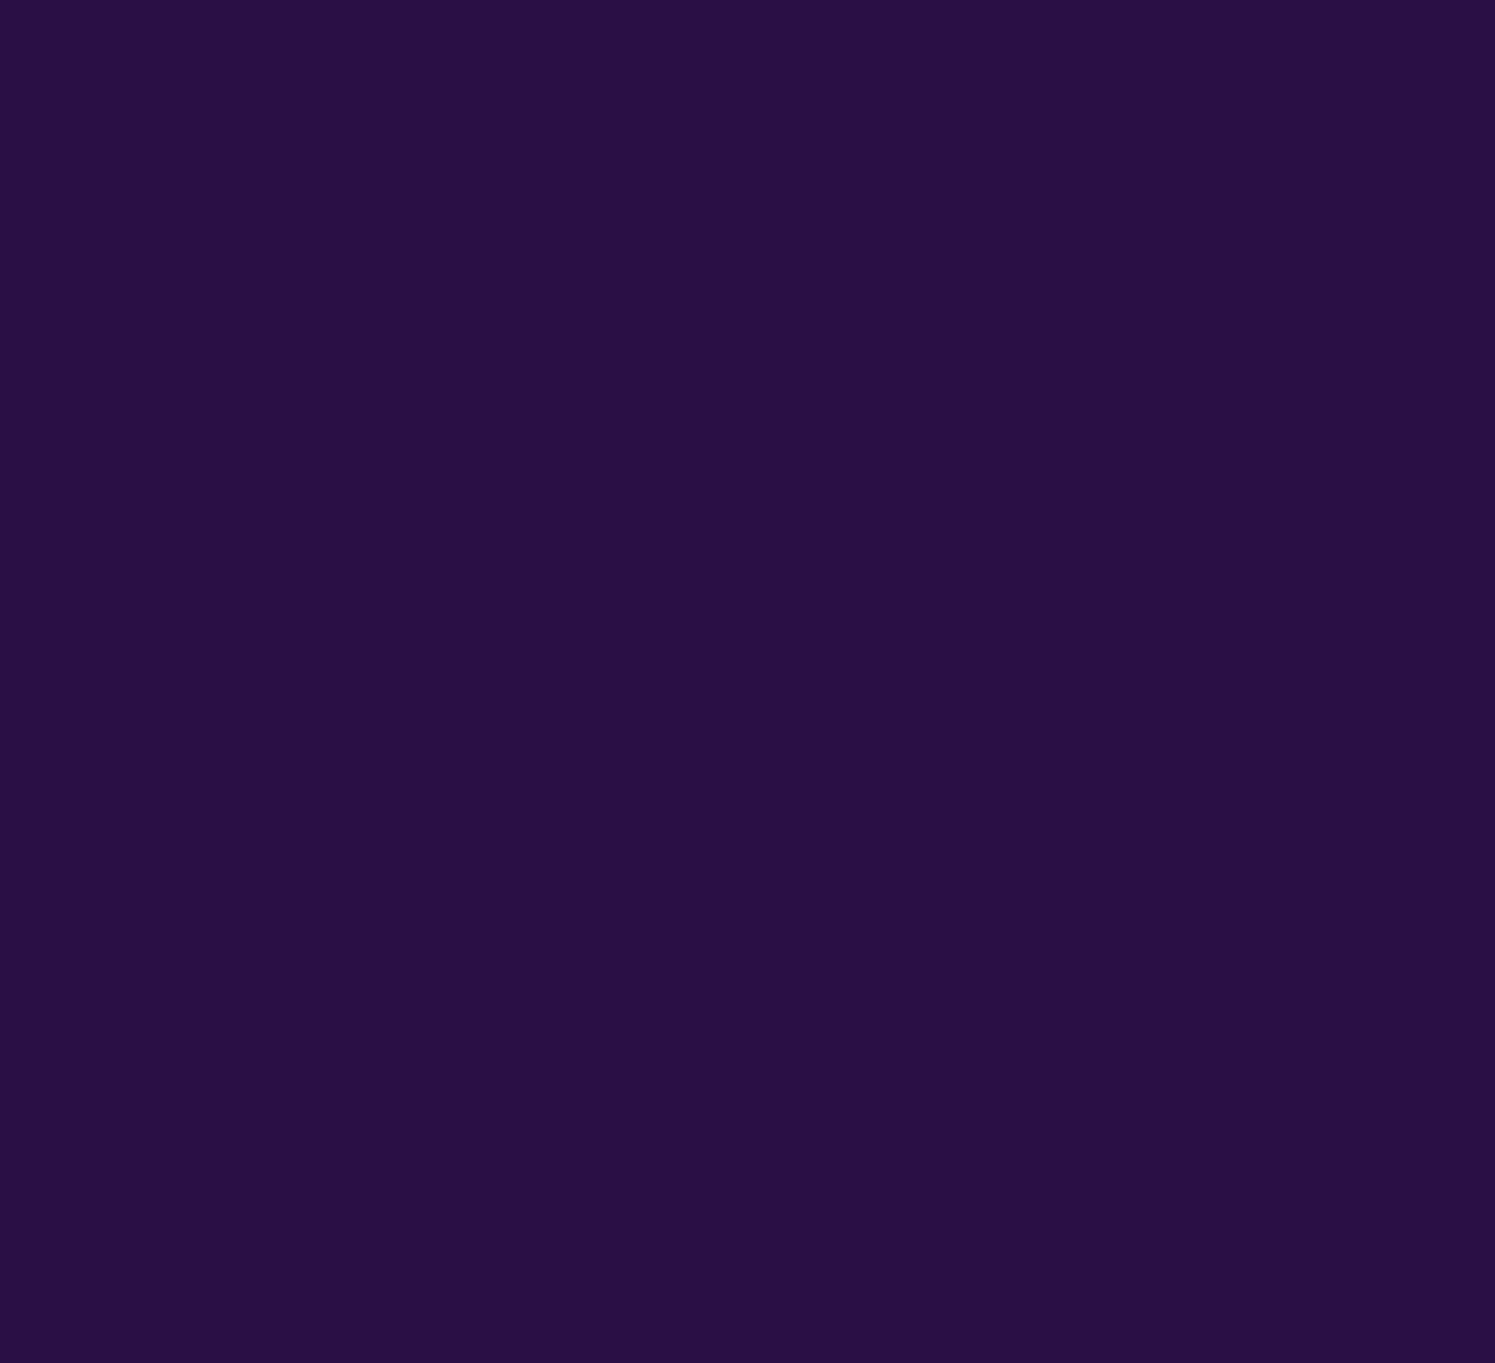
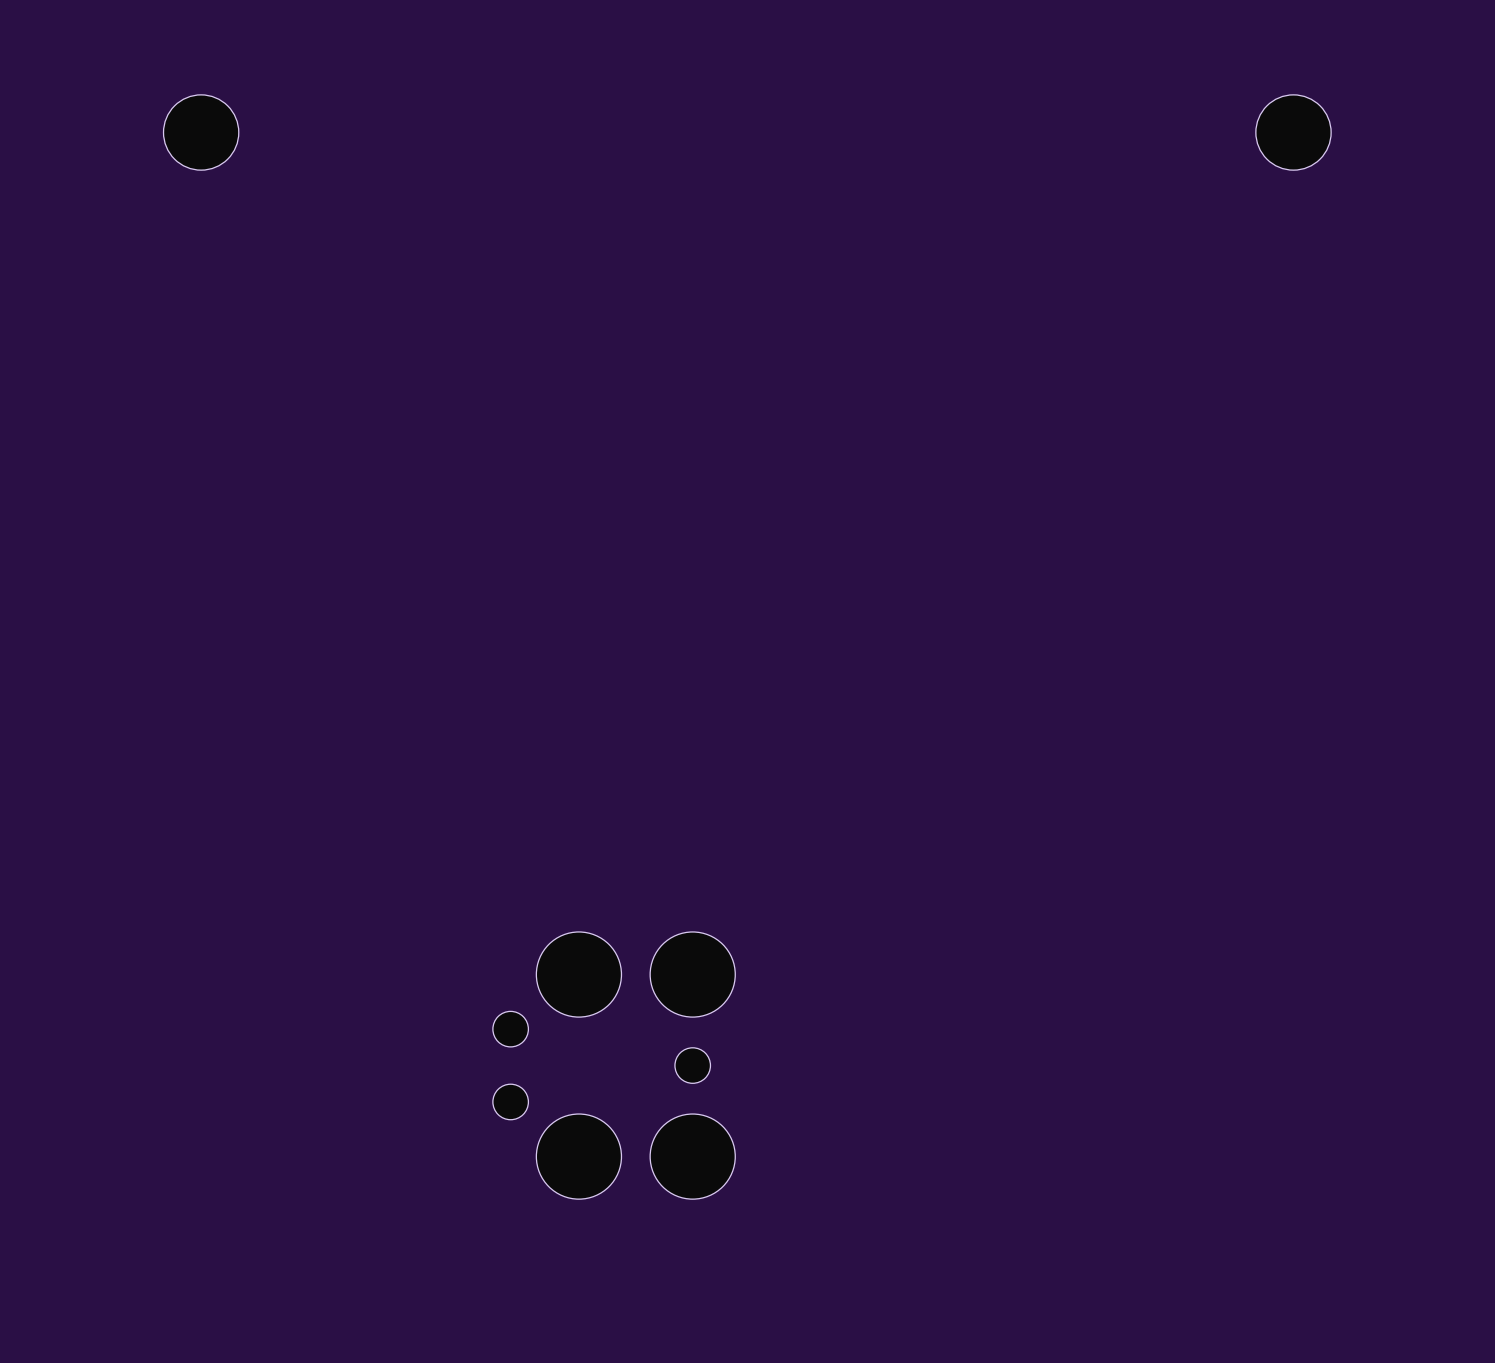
part: none -> (201, 132)
part: none -> (1293, 132)
part: none -> (614, 1065)

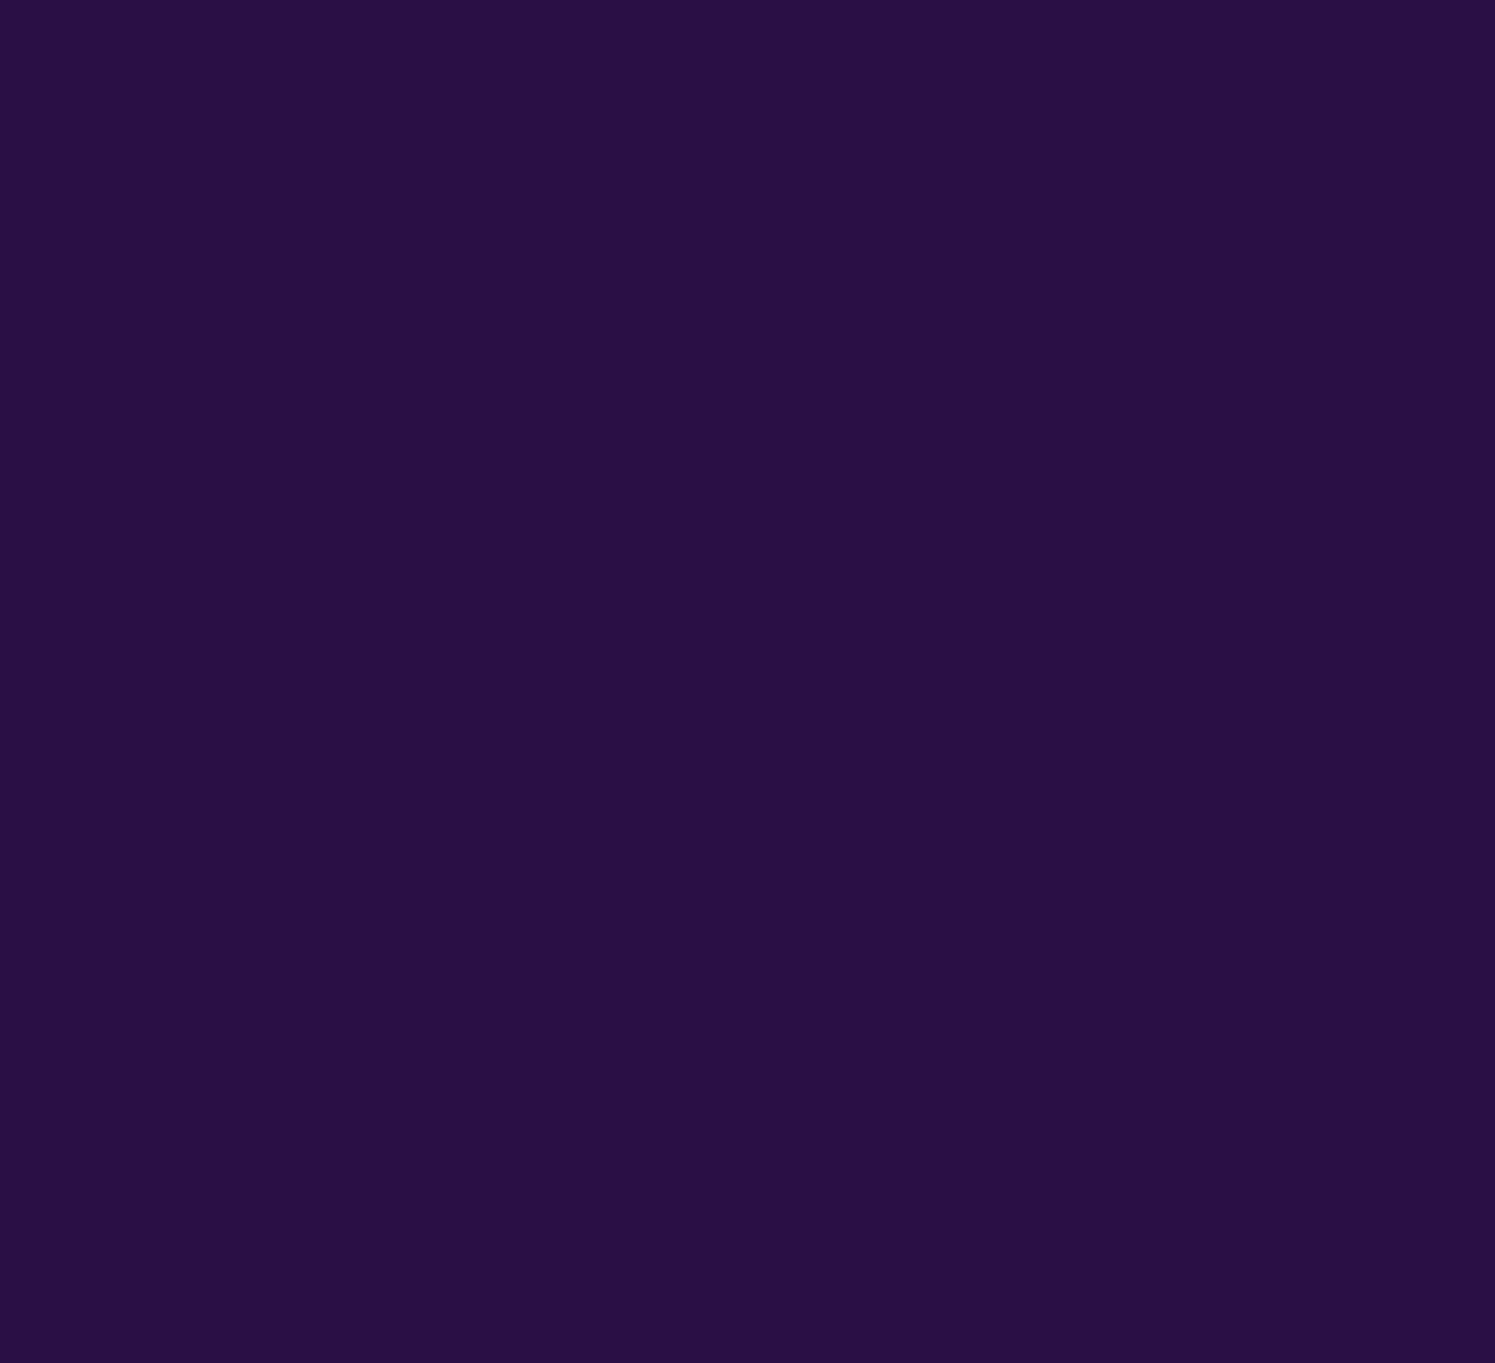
part: (201, 132) -> none
part: (1293, 132) -> none
part: (614, 1065) -> none

